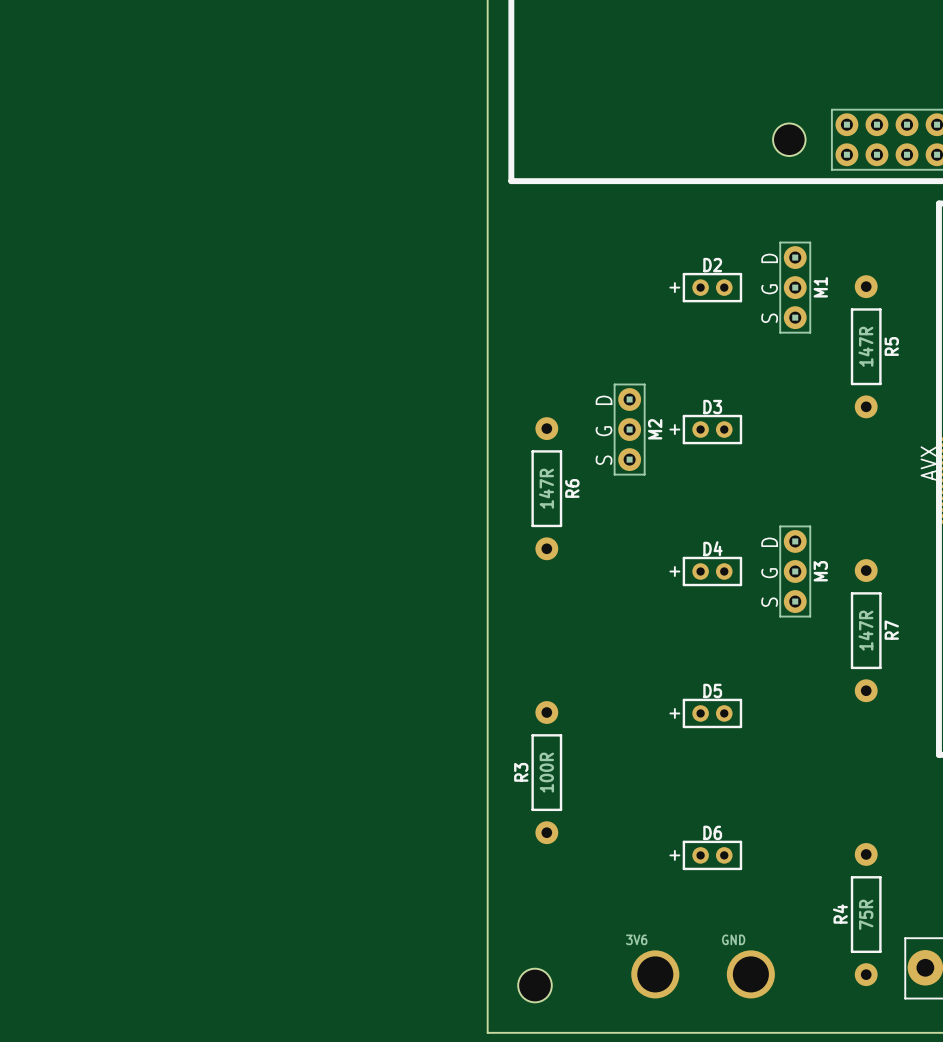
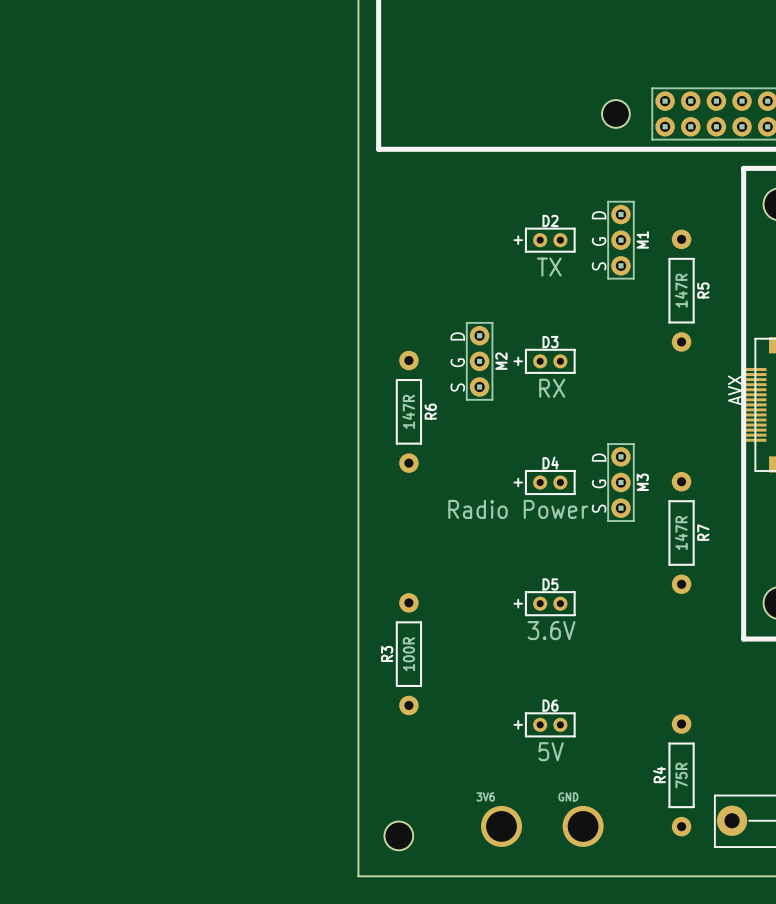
text: none -> TX (549, 267)
text: none -> RX (552, 388)
text: none -> Radio Power (518, 509)
text: none -> 3.6V (551, 630)
text: none -> 5V (551, 751)

